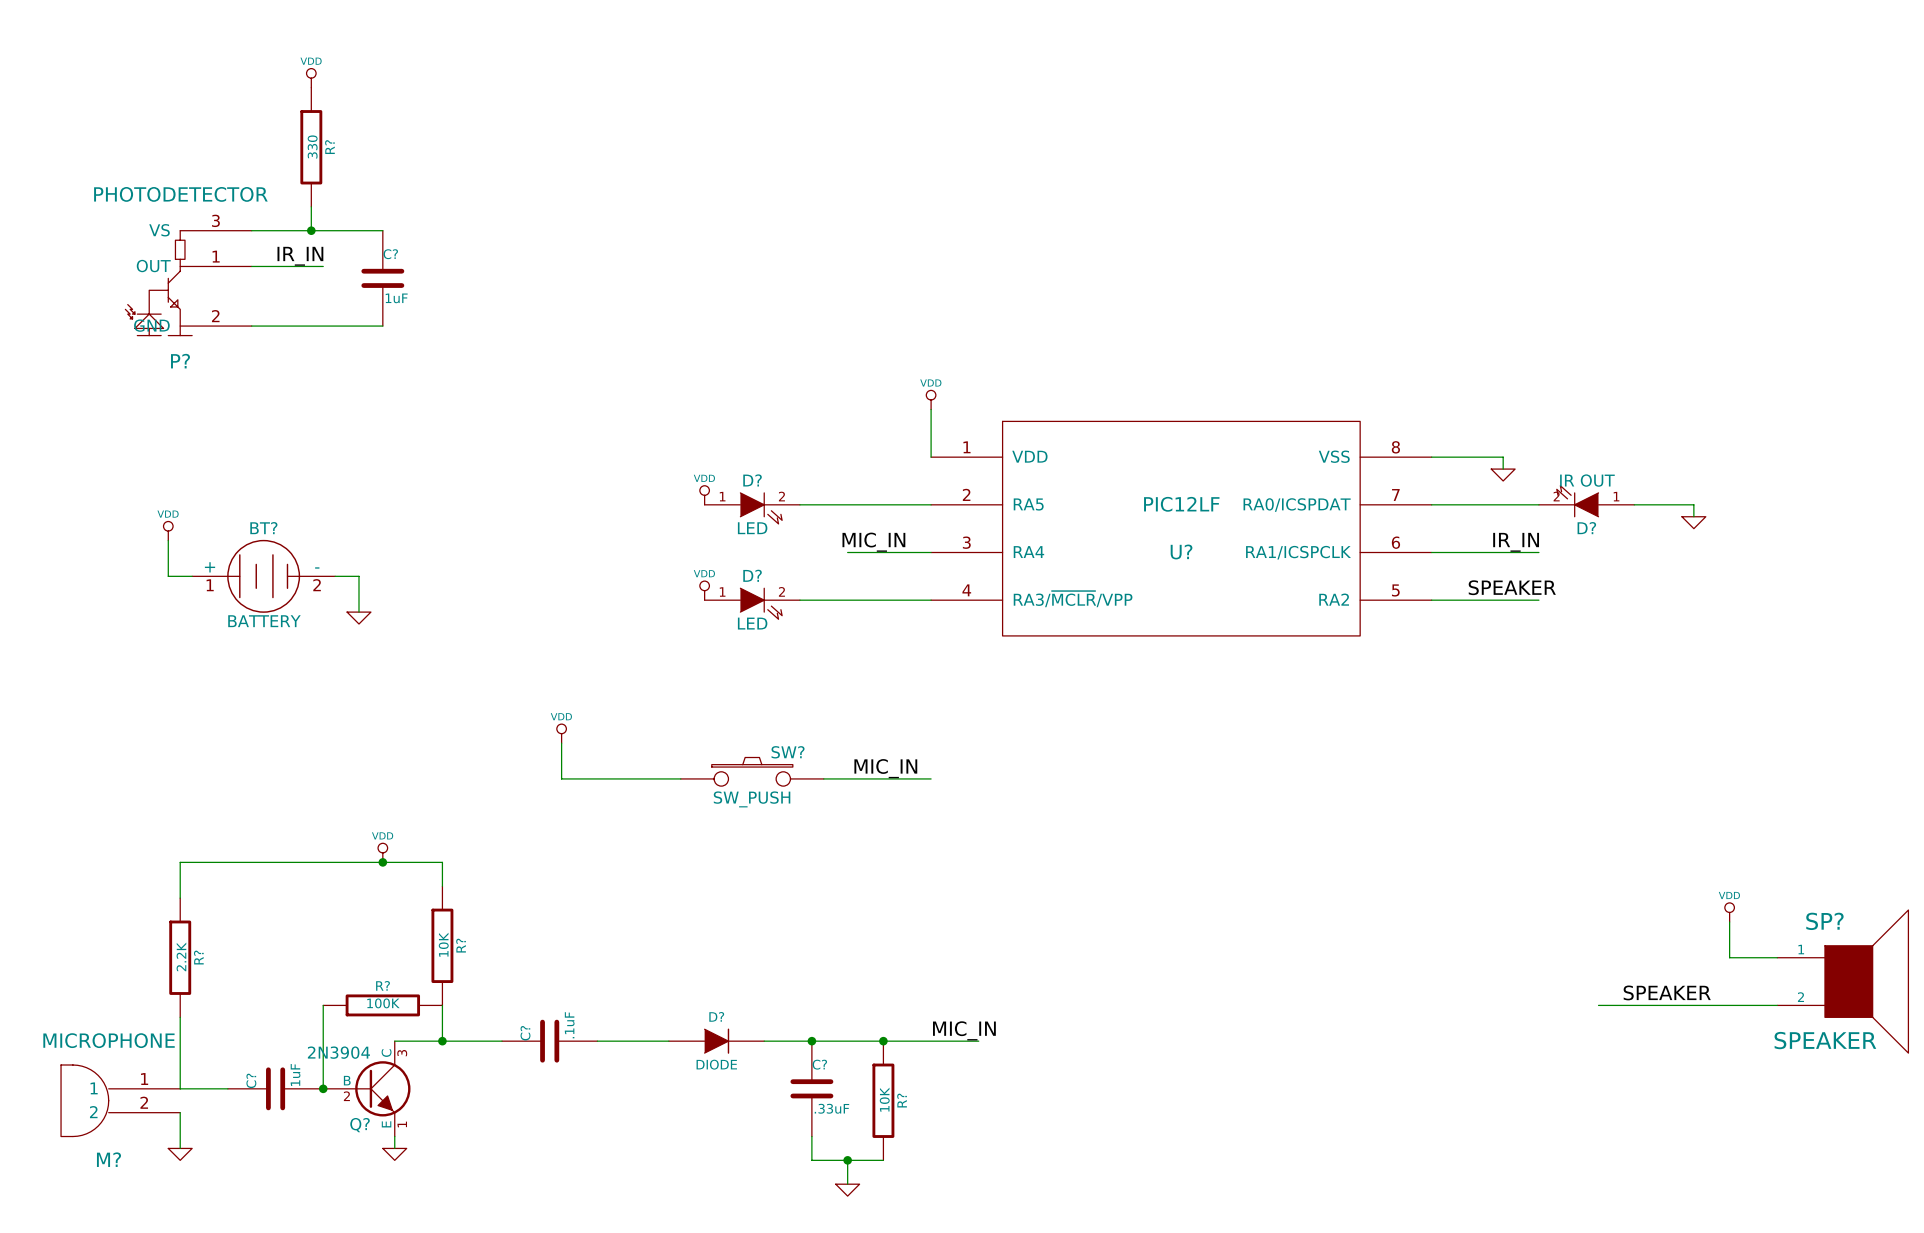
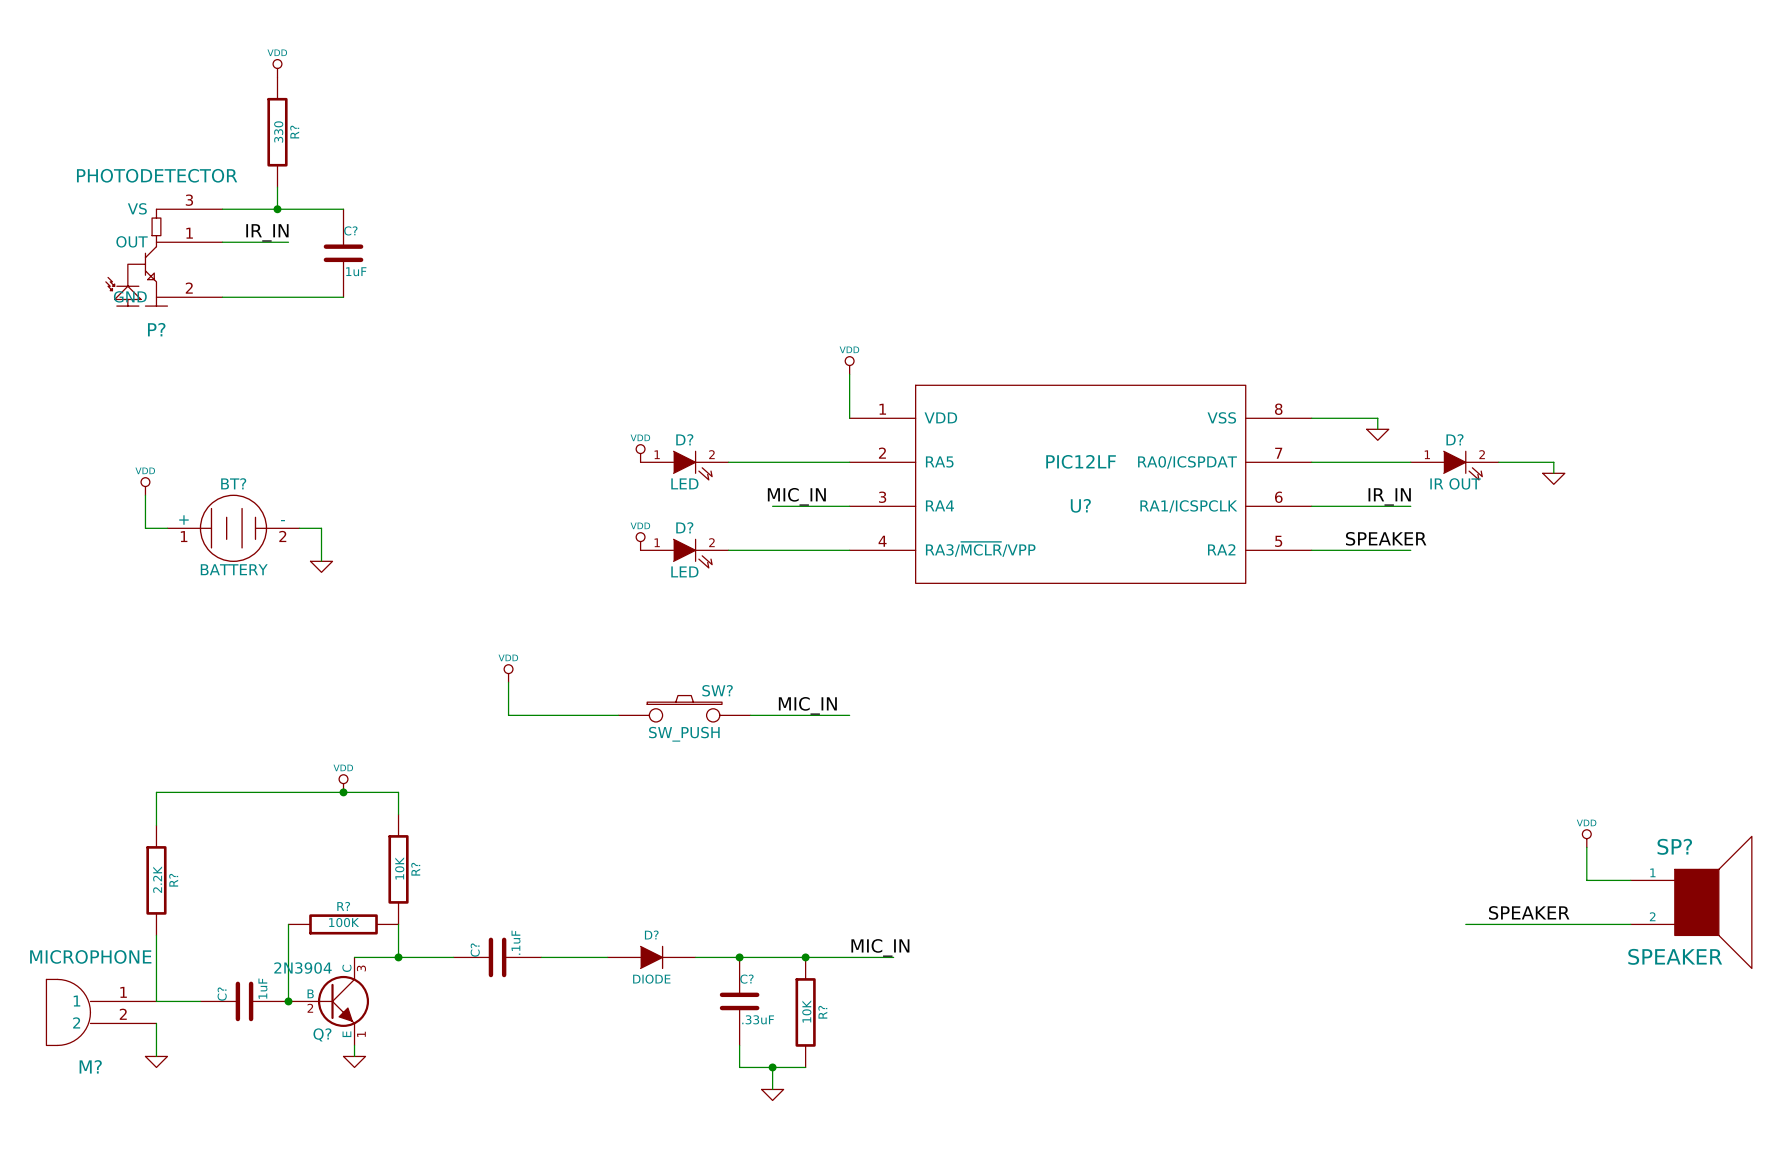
D? rotation: 0° (1577, 501) -> 180° (1463, 465)

